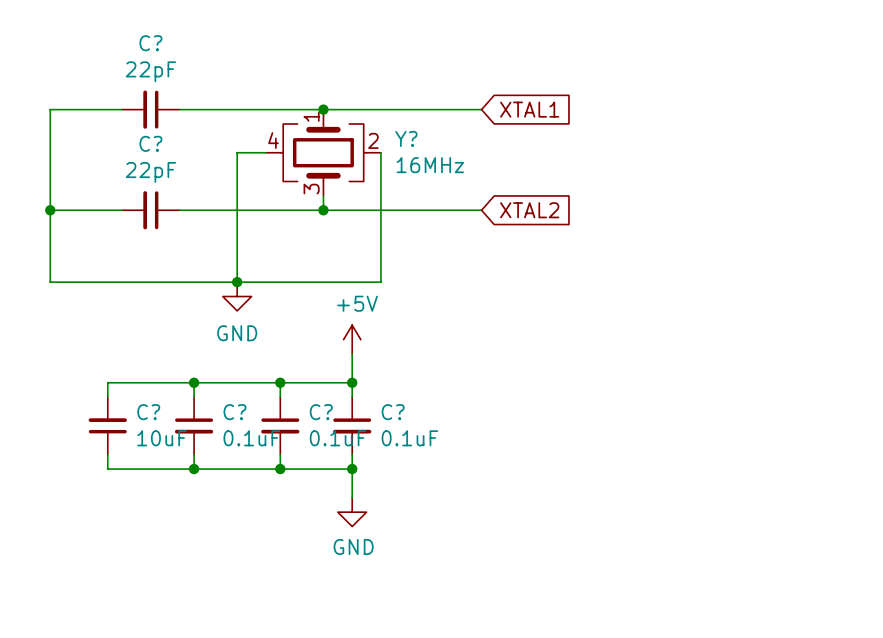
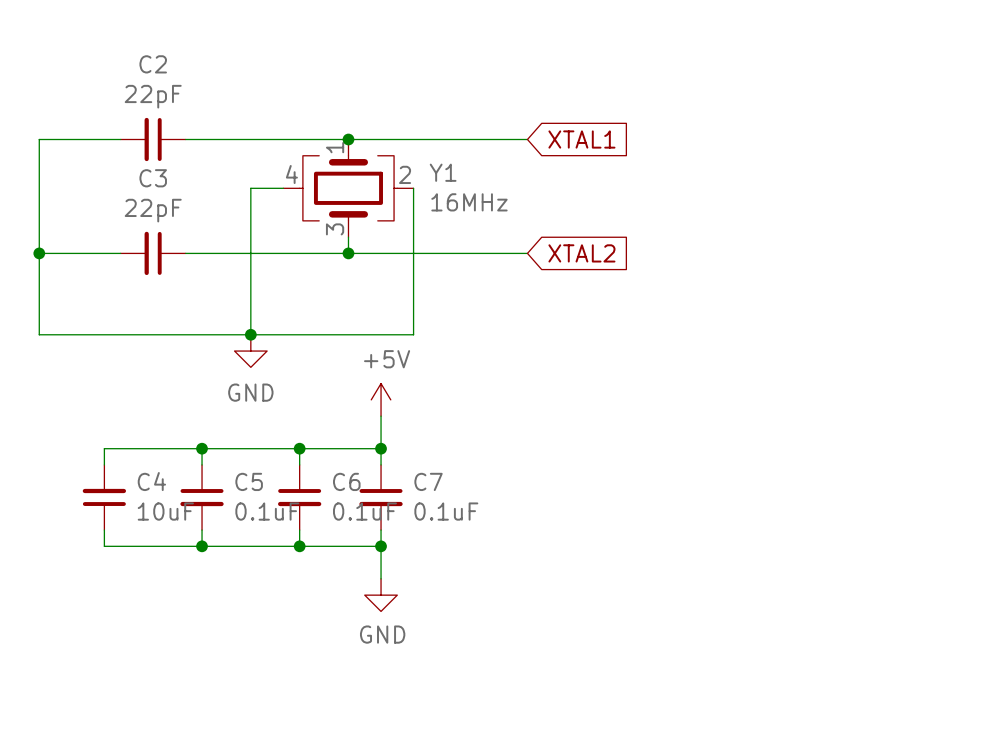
C? name: C? (150, 43) -> C2 (153, 64)
Y? name: Y? (406, 138) -> Y1 (443, 172)
C? name: C? (150, 143) -> C3 (153, 178)
C? name: C? (148, 412) -> C4 (151, 481)
C? name: C? (234, 412) -> C5 (249, 481)
C? name: C? (321, 412) -> C6 (346, 481)
C? name: C? (393, 412) -> C7 (428, 481)

